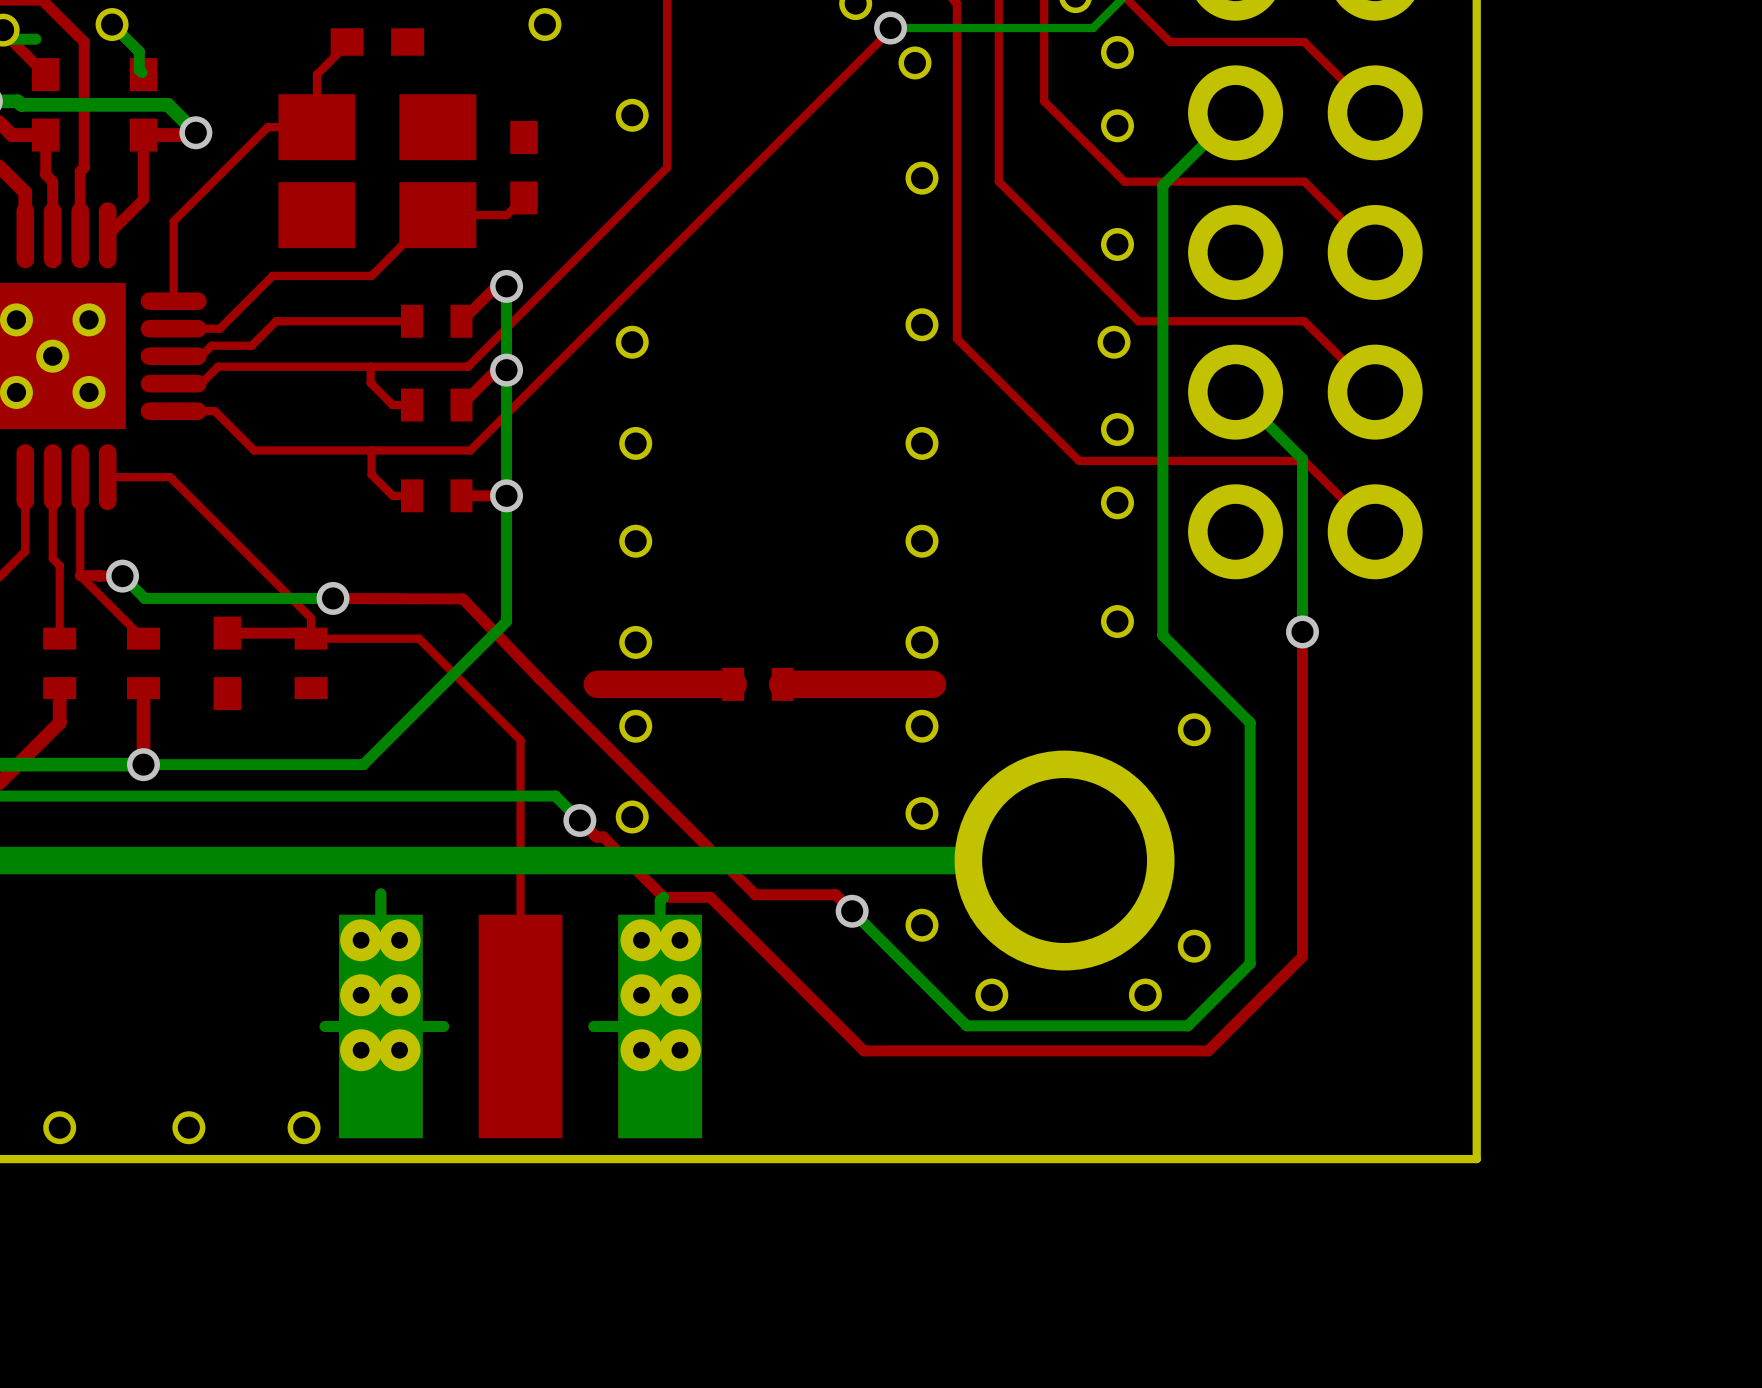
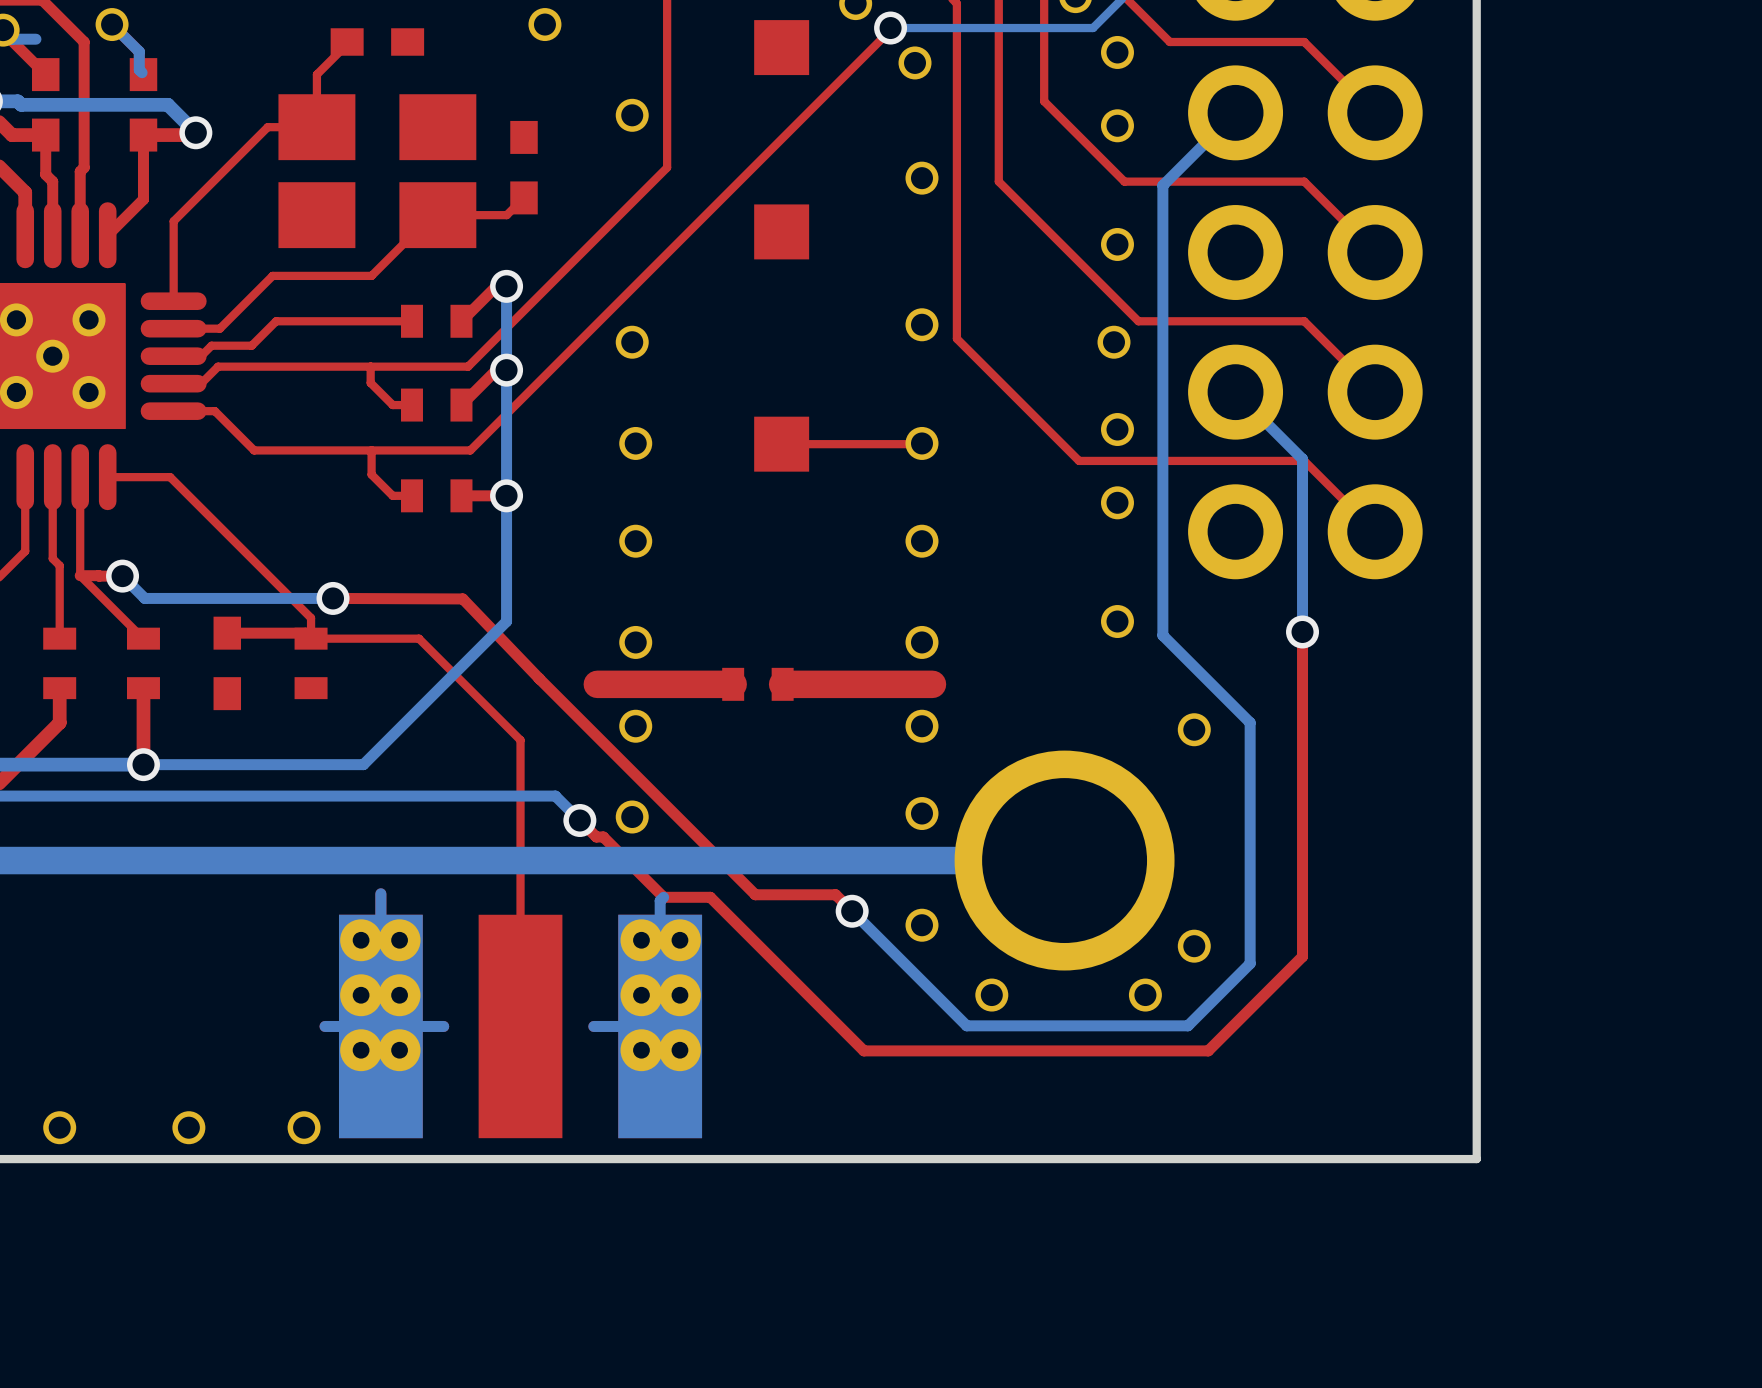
part: none -> (781, 47)
part: none -> (781, 231)
part: none -> (781, 444)
top track: none -> (921, 444) (781, 444)

